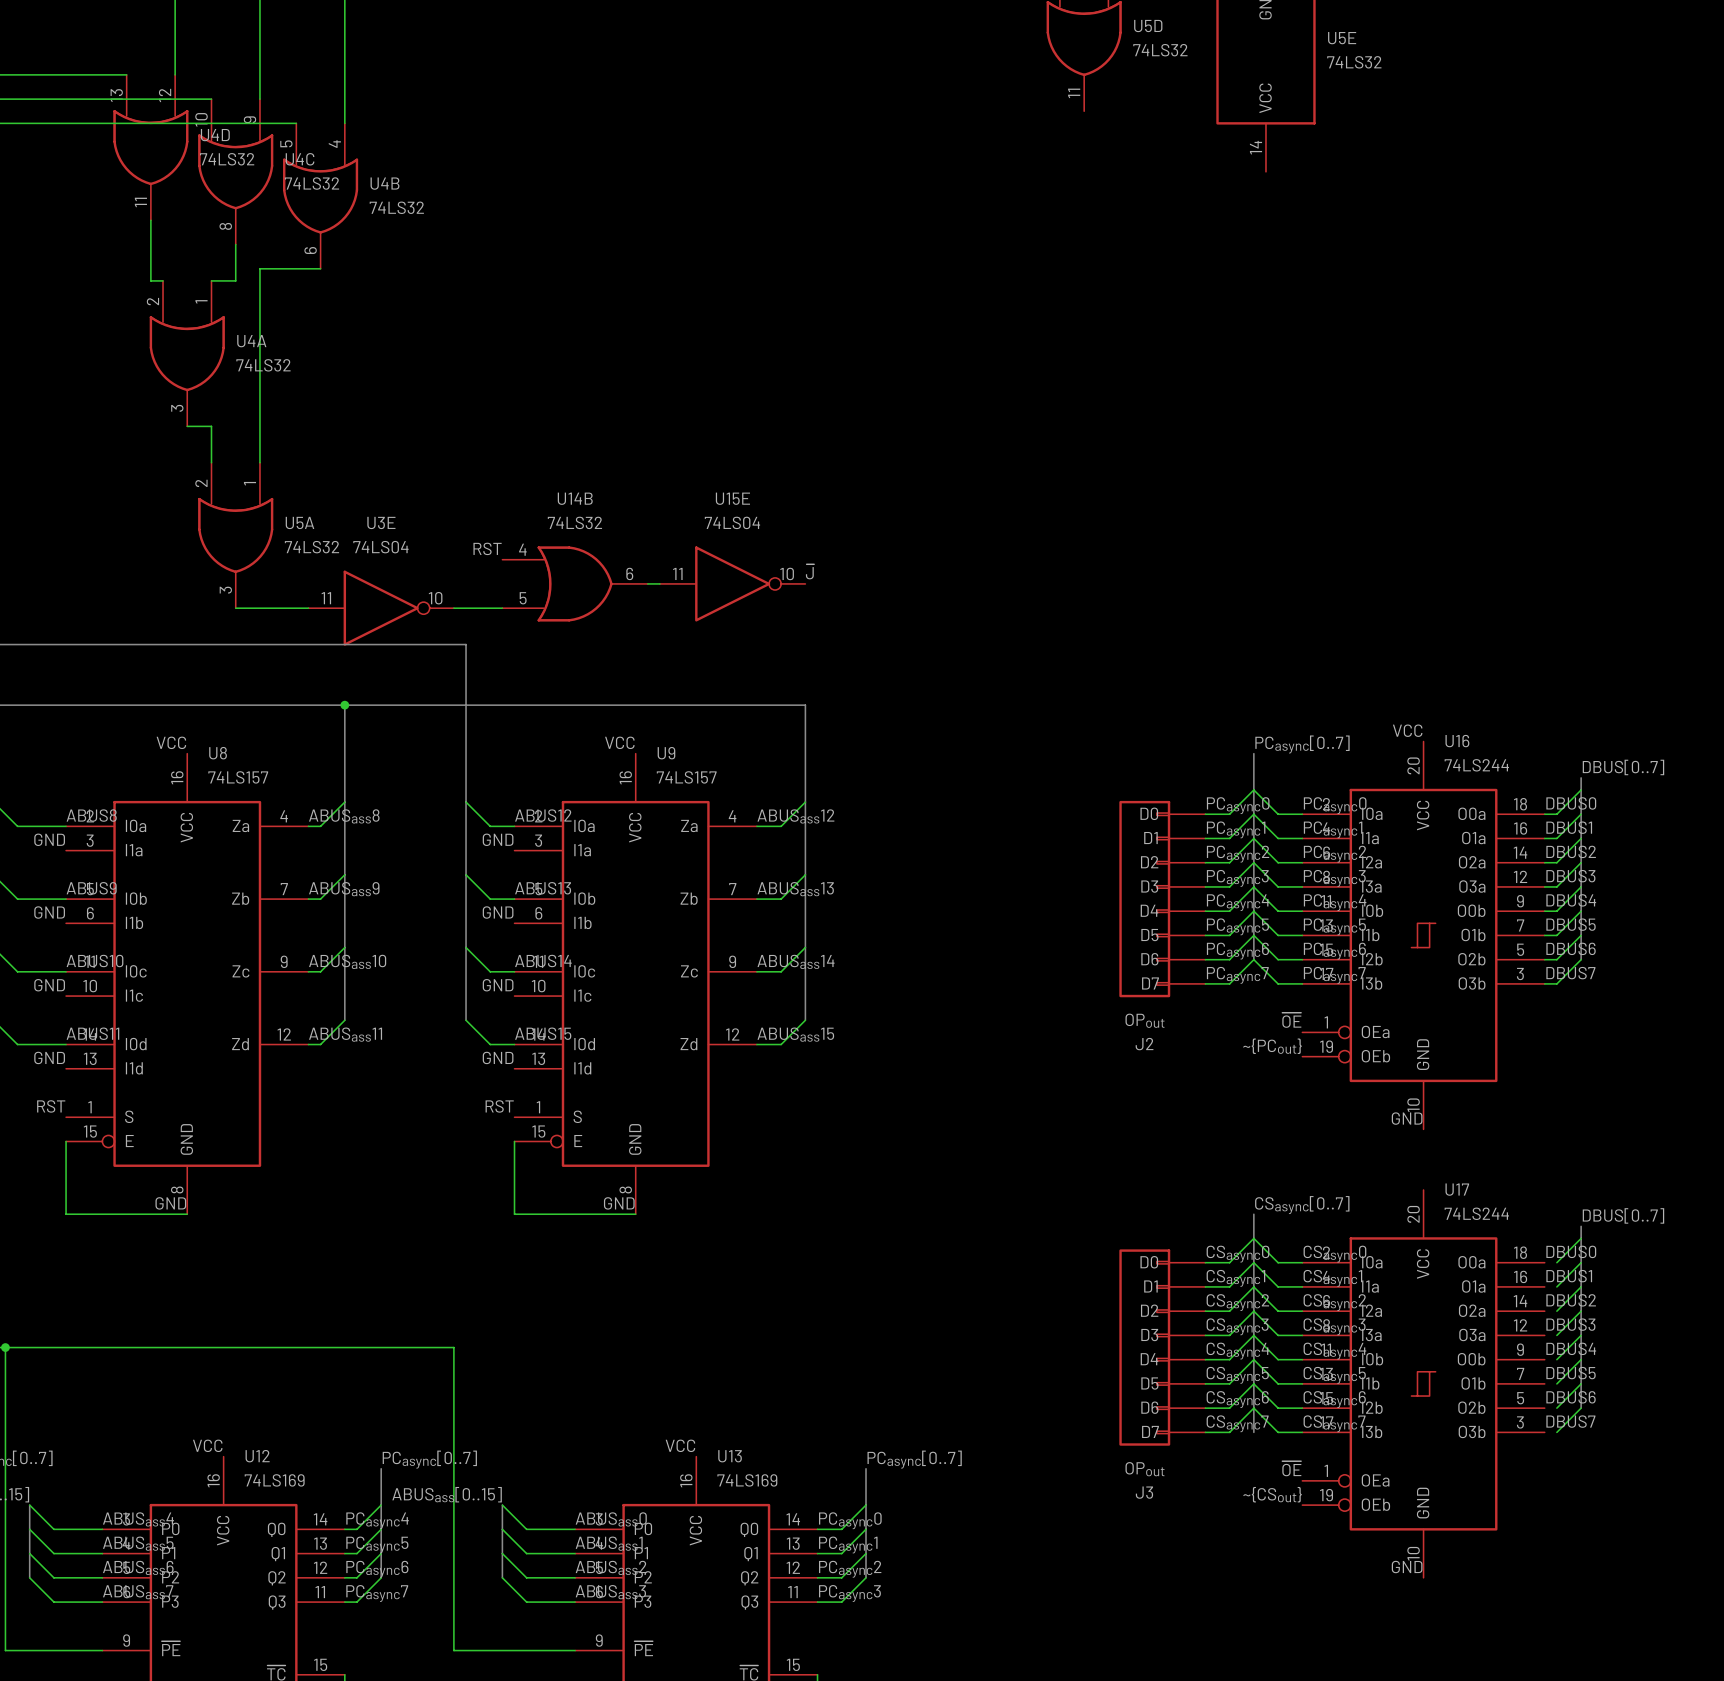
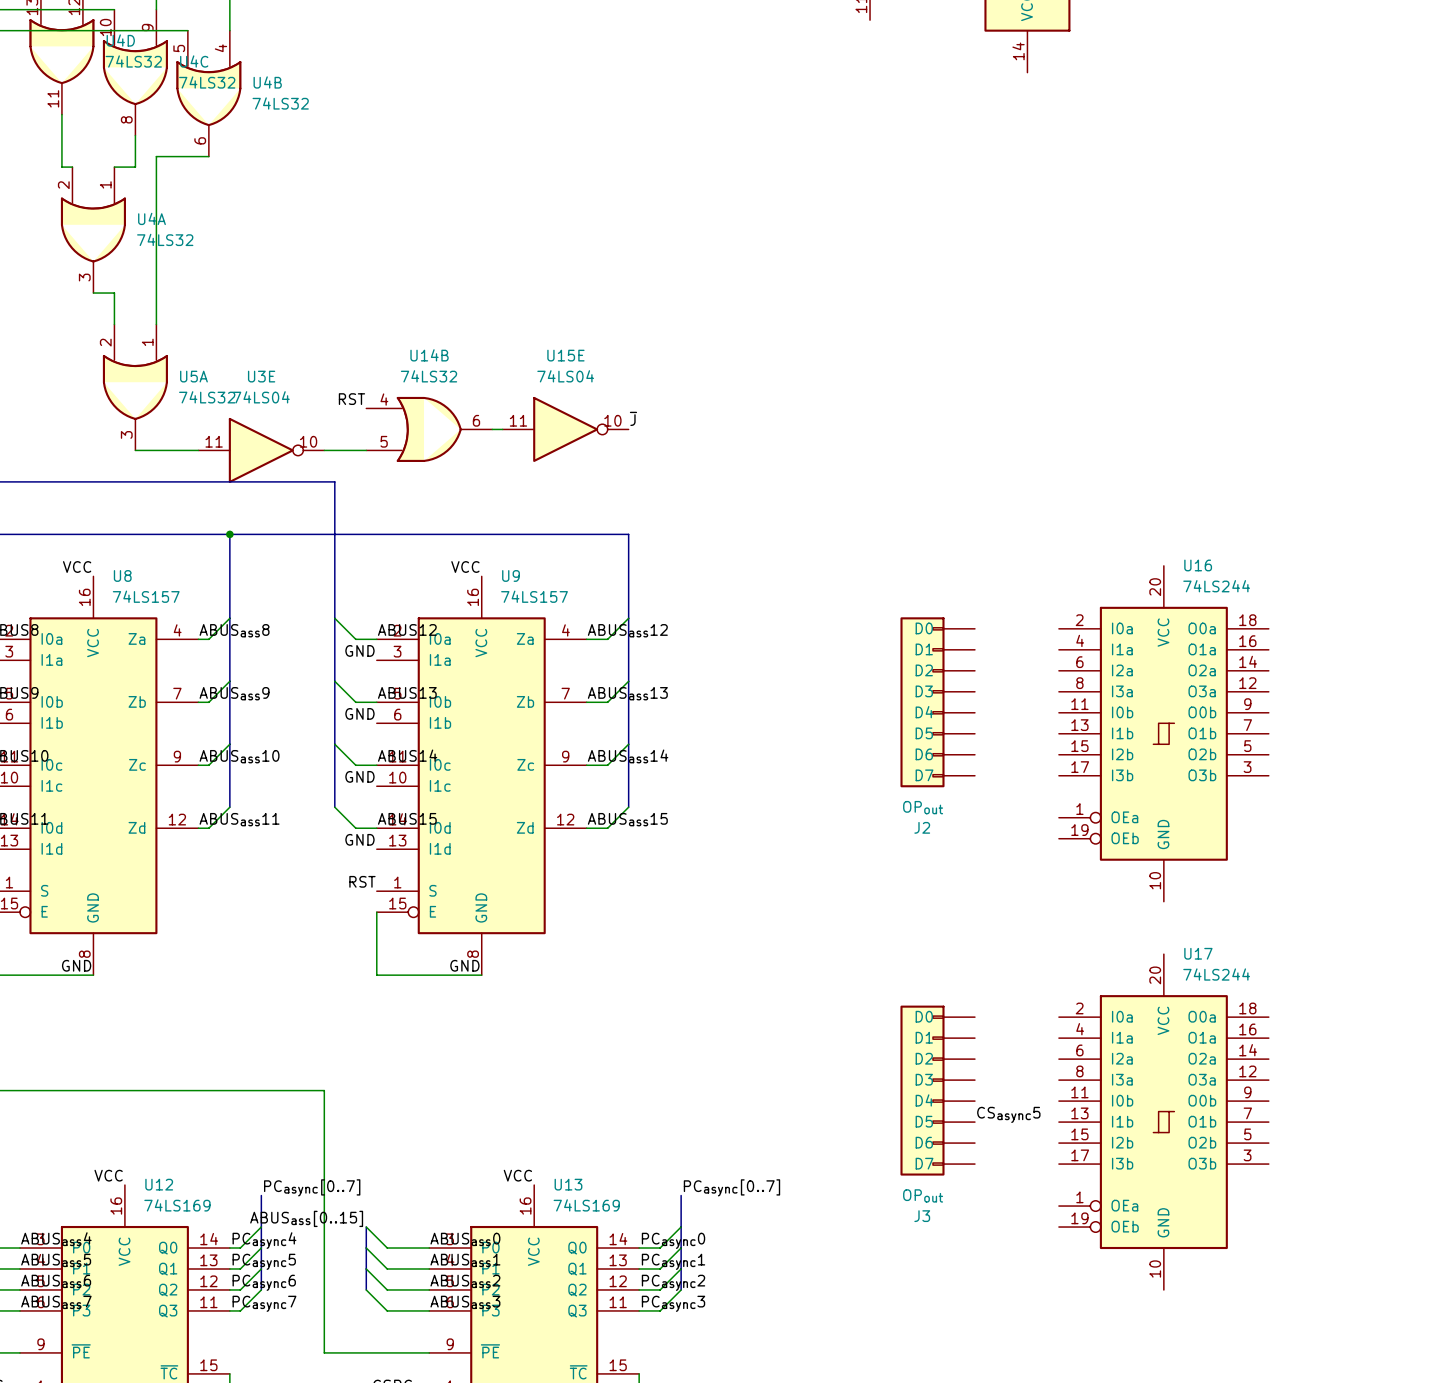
label: VCC (1407, 730) -> none
label: PCasync[0..7] (1302, 744) -> none
bus: (1253, 753) (1253, 959) -> none
label: DBUS[0..7] (1623, 767) -> none
bus: (1581, 777) (1581, 959) -> none
wire: (1581, 790) (1556, 814) (1544, 814) -> none
label: DBUS0 (1571, 803) -> none
label: PCasync0 (1238, 805) -> none
label: PCasync0 (1335, 805) -> none
wire: (1205, 814) (1229, 814) (1253, 790) (1278, 814) (1302, 814) -> none
wire: (1581, 814) (1556, 838) (1544, 838) -> none
label: DBUS1 (1569, 827) -> none
label: PCasync1 (1236, 829) -> none
label: PCasync1 (1333, 829) -> none
wire: (1205, 838) (1229, 838) (1253, 814) (1278, 838) (1302, 838) -> none
wire: (1581, 838) (1556, 862) (1544, 862) -> none
label: DBUS2 (1571, 851) -> none
label: PCasync2 (1238, 854) -> none
label: PCasync2 (1335, 854) -> none
wire: (1205, 862) (1229, 862) (1253, 838) (1278, 862) (1302, 862) -> none
wire: (1581, 862) (1556, 886) (1544, 886) -> none
label: DBUS3 (1570, 876) -> none
label: PCasync3 (1237, 878) -> none
label: PCasync3 (1334, 878) -> none
wire: (1205, 886) (1229, 886) (1253, 862) (1278, 886) (1302, 886) -> none
wire: (1581, 886) (1556, 911) (1544, 911) -> none
label: DBUS4 (1571, 900) -> none
label: PCasync4 (1238, 902) -> none
label: PCasync4 (1335, 902) -> none
wire: (1205, 911) (1229, 911) (1253, 886) (1278, 911) (1302, 911) -> none
wire: (1581, 911) (1556, 935) (1544, 935) -> none
label: DBUS5 (1571, 924) -> none
label: PCasync5 (1237, 926) -> none
label: PCasync5 (1334, 926) -> none
wire: (1205, 935) (1229, 935) (1253, 911) (1278, 935) (1302, 935) -> none
wire: (1581, 935) (1556, 959) (1544, 959) -> none
label: DBUS6 (1571, 948) -> none
label: PCasync6 (1237, 951) -> none
label: PCasync6 (1334, 951) -> none
wire: (1205, 959) (1229, 959) (1253, 935) (1278, 959) (1302, 959) -> none
wire: (1581, 959) (1556, 983) (1544, 983) -> none
label: DBUS7 (1570, 973) -> none
label: PCasync7 (1237, 975) -> none
label: PCasync7 (1334, 975) -> none
wire: (1205, 983) (1229, 983) (1253, 959) (1278, 983) (1302, 983) -> none
label: ~{OE} (1291, 1020) -> none
label: ~{PCout} (1272, 1046) -> none
label: GND (1407, 1118) -> none
label: CSasync[0..7] (1302, 1205) -> none
bus: (1253, 1214) (1253, 1432) -> none
label: DBUS[0..7] (1623, 1215) -> none
bus: (1581, 1226) (1581, 1408) -> none
wire: (1581, 1238) (1556, 1262) -> none
label: DBUS0 (1571, 1251) -> none
label: CSasync0 (1237, 1254) -> none
label: CSasync0 (1334, 1254) -> none
wire: (1205, 1262) (1229, 1262) (1253, 1238) (1278, 1262) (1302, 1262) -> none
wire: (1581, 1262) (1556, 1286) -> none
label: DBUS1 (1569, 1276) -> none
label: CSasync1 (1235, 1278) -> none
label: CSasync1 (1332, 1278) -> none
wire: (1205, 1286) (1229, 1286) (1253, 1262) (1278, 1286) (1302, 1286) -> none
wire: (1581, 1286) (1556, 1311) -> none
label: DBUS2 (1571, 1300) -> none
label: CSasync2 (1237, 1302) -> none
label: CSasync2 (1334, 1302) -> none
wire: (1205, 1311) (1229, 1311) (1253, 1286) (1278, 1311) (1302, 1311) -> none
wire: (1581, 1311) (1556, 1335) -> none
label: DBUS3 (1570, 1324) -> none
label: CSasync3 (1237, 1326) -> none
label: CSasync3 (1334, 1326) -> none
wire: (1205, 1335) (1229, 1335) (1253, 1311) (1278, 1335) (1302, 1335) -> none
wire: (1581, 1335) (1556, 1359) -> none
label: DBUS4 (1571, 1348) -> none
label: CSasync4 (1237, 1351) -> none
label: CSasync4 (1334, 1351) -> none
wire: (1205, 1359) (1229, 1359) (1253, 1335) (1278, 1359) (1302, 1359) -> none
wire: (1581, 1359) (1556, 1383) -> none
label: DBUS5 (1571, 1373) -> none
label: CSasync5 (1334, 1375) -> none
wire: (1205, 1383) (1229, 1383) (1253, 1359) (1278, 1383) (1302, 1383) -> none
wire: (1581, 1383) (1556, 1408) -> none
label: DBUS6 (1571, 1397) -> none
label: CSasync6 (1237, 1399) -> none
label: CSasync6 (1334, 1399) -> none
wire: (1205, 1408) (1229, 1408) (1253, 1383) (1278, 1408) (1302, 1408) -> none
wire: (1581, 1408) (1556, 1432) -> none
label: DBUS7 (1570, 1421) -> none
label: CSasync7 (1237, 1423) -> none
label: CSasync7 (1334, 1423) -> none
wire: (1205, 1432) (1229, 1432) (1253, 1408) (1278, 1432) (1302, 1432) -> none
label: ~{OE} (1291, 1468) -> none
label: ~{CSout} (1272, 1494) -> none
label: GND (1407, 1567) -> none

